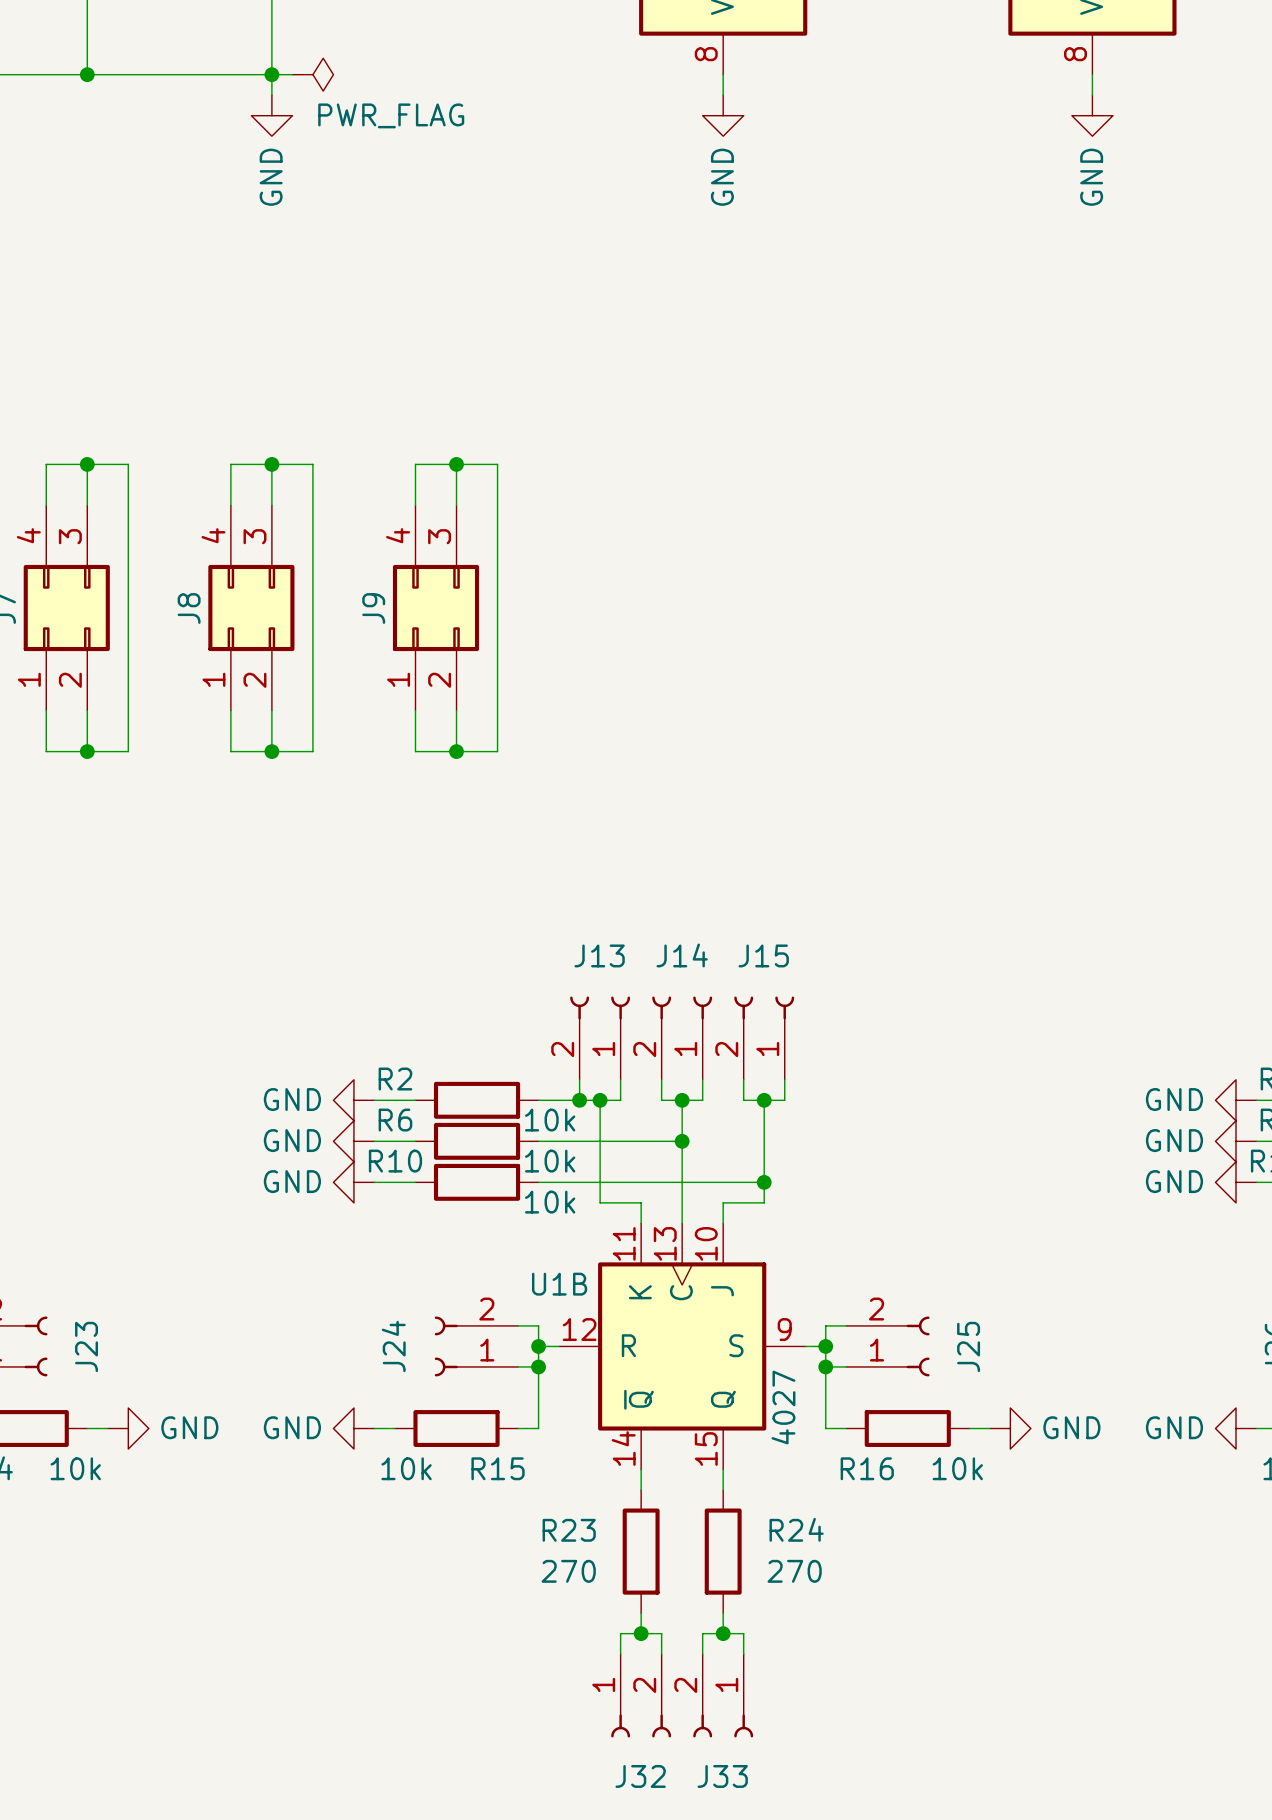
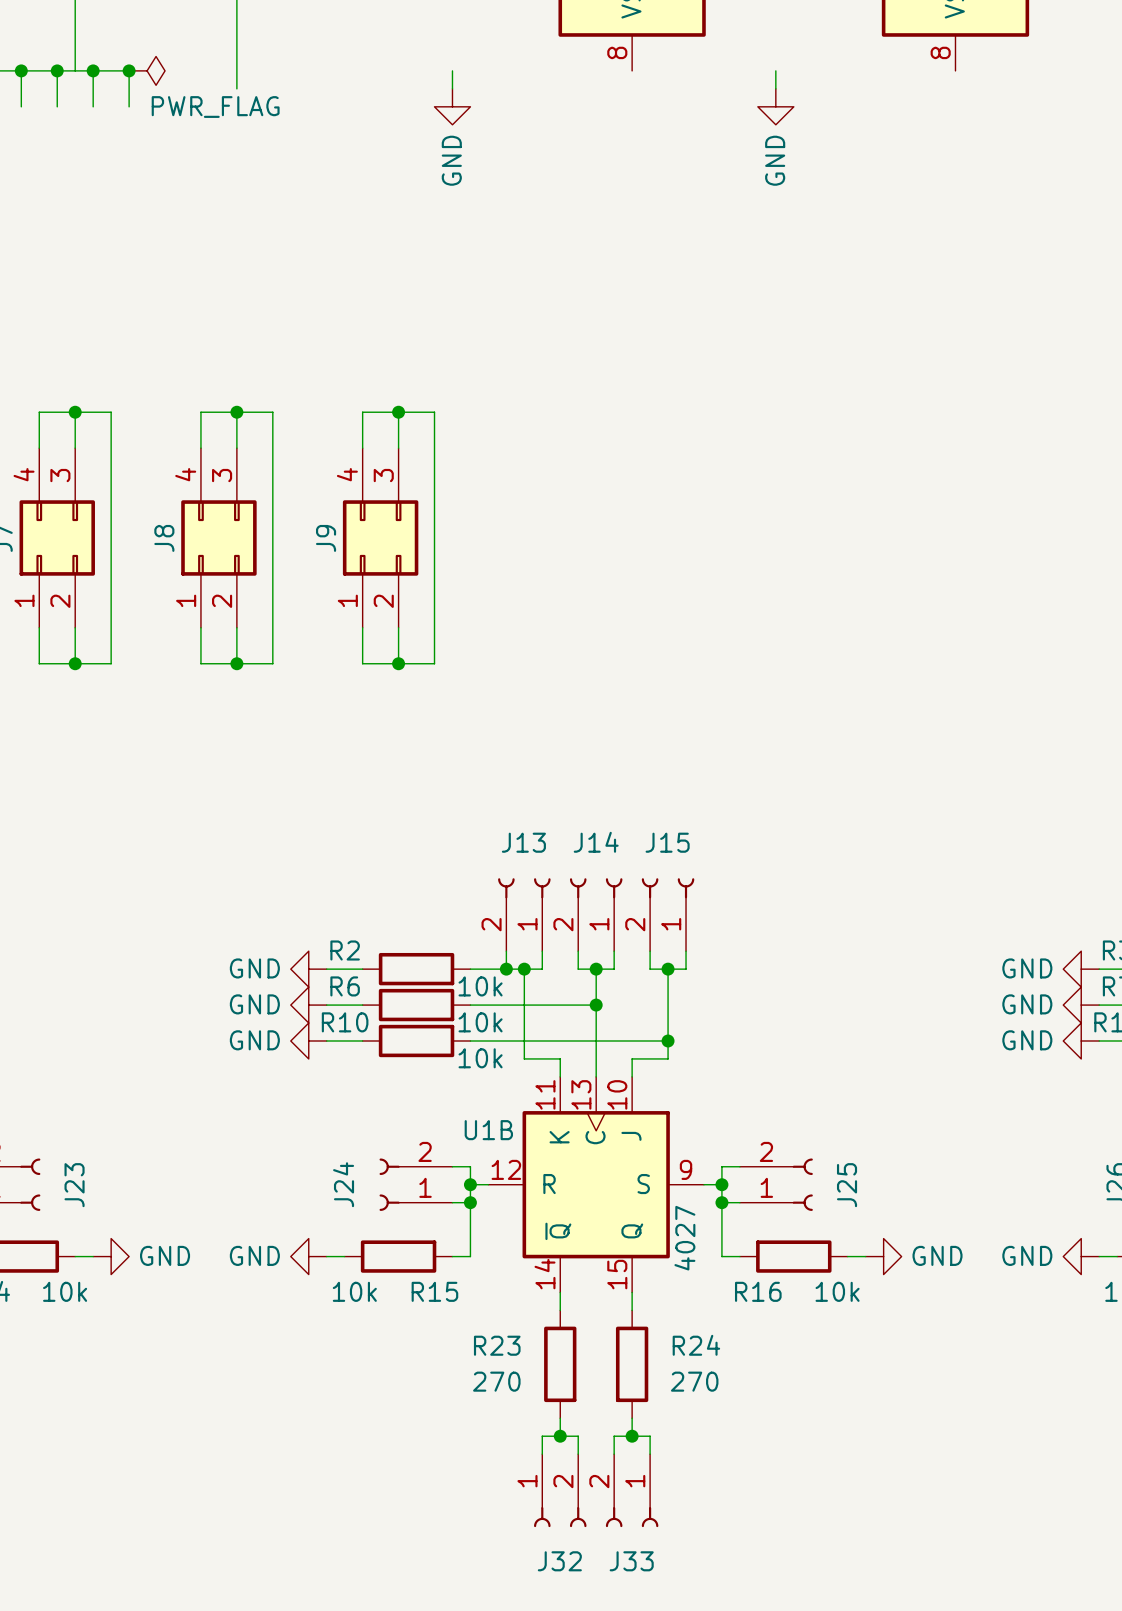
wire: none -> (21, 70) (21, 106)
junction: none -> (21, 70)
wire: none -> (57, 70) (57, 106)
junction: none -> (57, 70)
junction: (87, 74) -> none
wire: none -> (93, 70) (93, 106)
junction: none -> (93, 70)
wire: (148, 74) (292, 74) -> (129, 70) (129, 106)
junction: none -> (129, 70)
junction: (271, 74) -> none
power symbol position: PWR_FLAG (312, 74) -> PWR_FLAG (147, 70)
wire: (723, 74) (723, 95) -> (452, 70) (452, 88)
wire: (1092, 74) (1092, 95) -> (775, 70) (775, 88)
power symbol: GND (271, 115) -> none
power symbol: none -> GND (452, 106)
power symbol: GND (723, 115) -> none
power symbol: none -> GND (775, 106)
power symbol: GND (1092, 115) -> none

